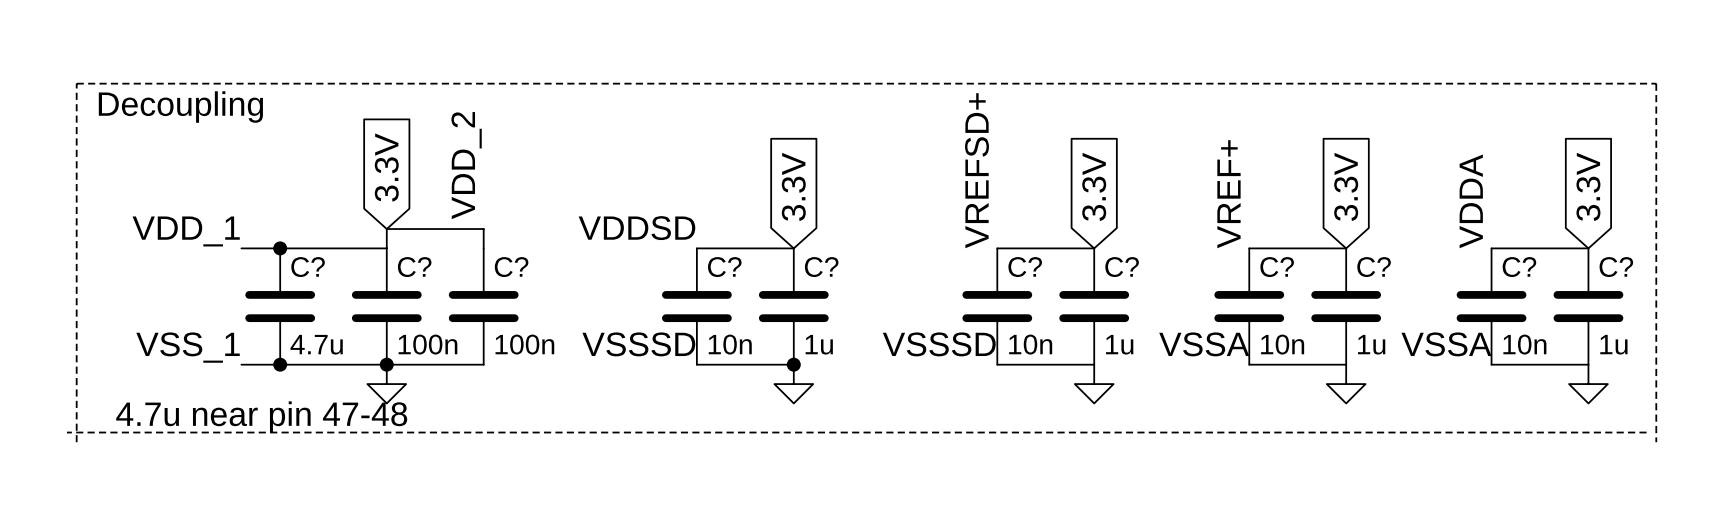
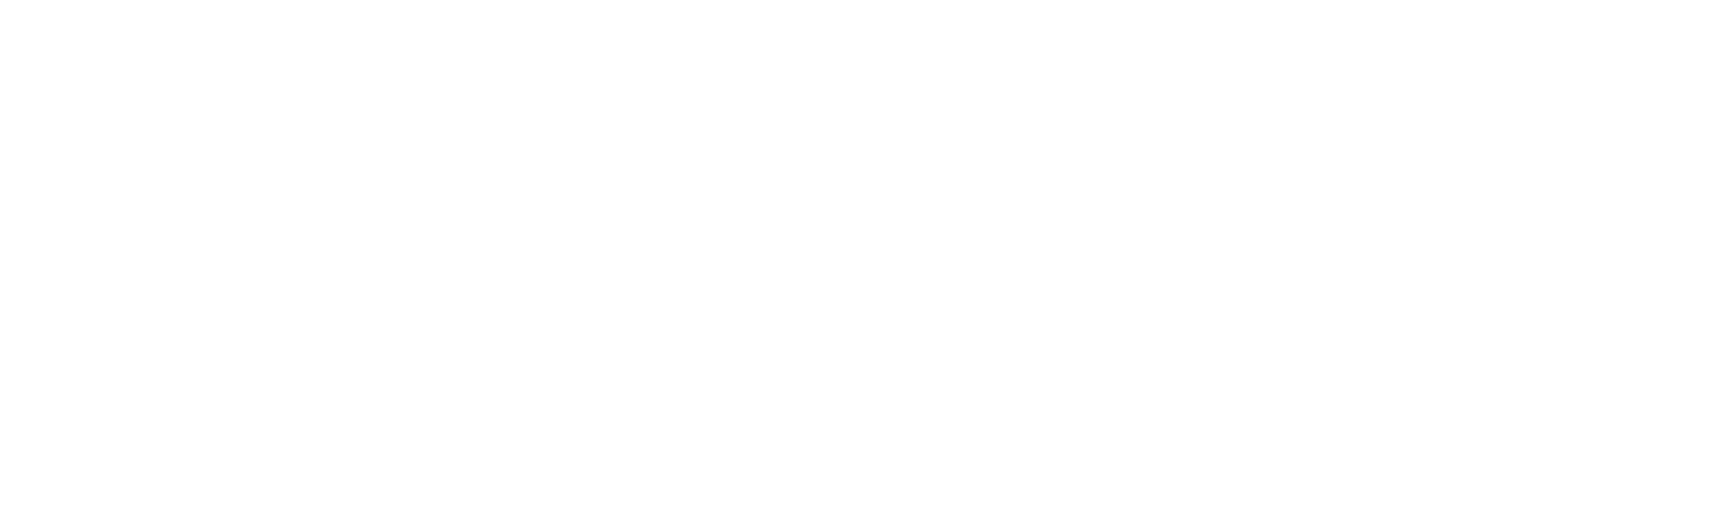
text: Decoupling (180, 107) -> none
label: VDD_2 (466, 165) -> none
global label: 3.3V (386, 167) -> none
label: VREFSD+ (977, 170) -> none
global label: 3.3V (793, 186) -> none
global label: 3.3V (1094, 186) -> none
global label: 3.3V (1346, 186) -> none
global label: 3.3V (1588, 186) -> none
label: VREF+ (1228, 194) -> none
label: VDDA (1471, 201) -> none
label: VDDSD (636, 228) -> none
label: VDD_1 (186, 231) -> none
wire: (241, 248) (386, 248) (386, 229) (483, 229) (483, 248) -> none
junction: (280, 248) -> none
wire: (696, 248) (793, 248) -> none
wire: (997, 248) (1094, 248) -> none
wire: (1249, 248) (1346, 248) -> none
wire: (1491, 248) (1588, 248) -> none
C?: 4.7u (280, 306) -> none
C?: 100n (386, 306) -> none
C?: 100n (483, 306) -> none
C?: 10n (696, 306) -> none
C?: 1u (793, 306) -> none
C?: 10n (997, 306) -> none
C?: 1u (1094, 306) -> none
C?: 10n (1249, 306) -> none
C?: 1u (1346, 306) -> none
C?: 10n (1491, 306) -> none
C?: 1u (1588, 306) -> none
label: VSSSD (638, 344) -> none
label: VSSSD (939, 344) -> none
label: VSSA (1204, 344) -> none
label: VSSA (1446, 344) -> none
label: VSS_1 (188, 347) -> none
wire: (241, 364) (483, 364) -> none
junction: (280, 364) -> none
junction: (386, 364) -> none
wire: (696, 364) (793, 364) -> none
junction: (793, 364) -> none
wire: (997, 364) (1094, 364) -> none
wire: (1249, 364) (1346, 364) -> none
wire: (1491, 364) (1588, 364) -> none
power symbol: (386, 384) -> none
power symbol: (793, 384) -> none
power symbol: (1094, 384) -> none
power symbol: (1346, 384) -> none
power symbol: (1588, 384) -> none
text: 4.7u near pin 47-48 (261, 417) -> none
line: (66, 432) (1646, 432) -> none
line: (76, 442) (76, 83) (1656, 83) (1656, 442) -> none

